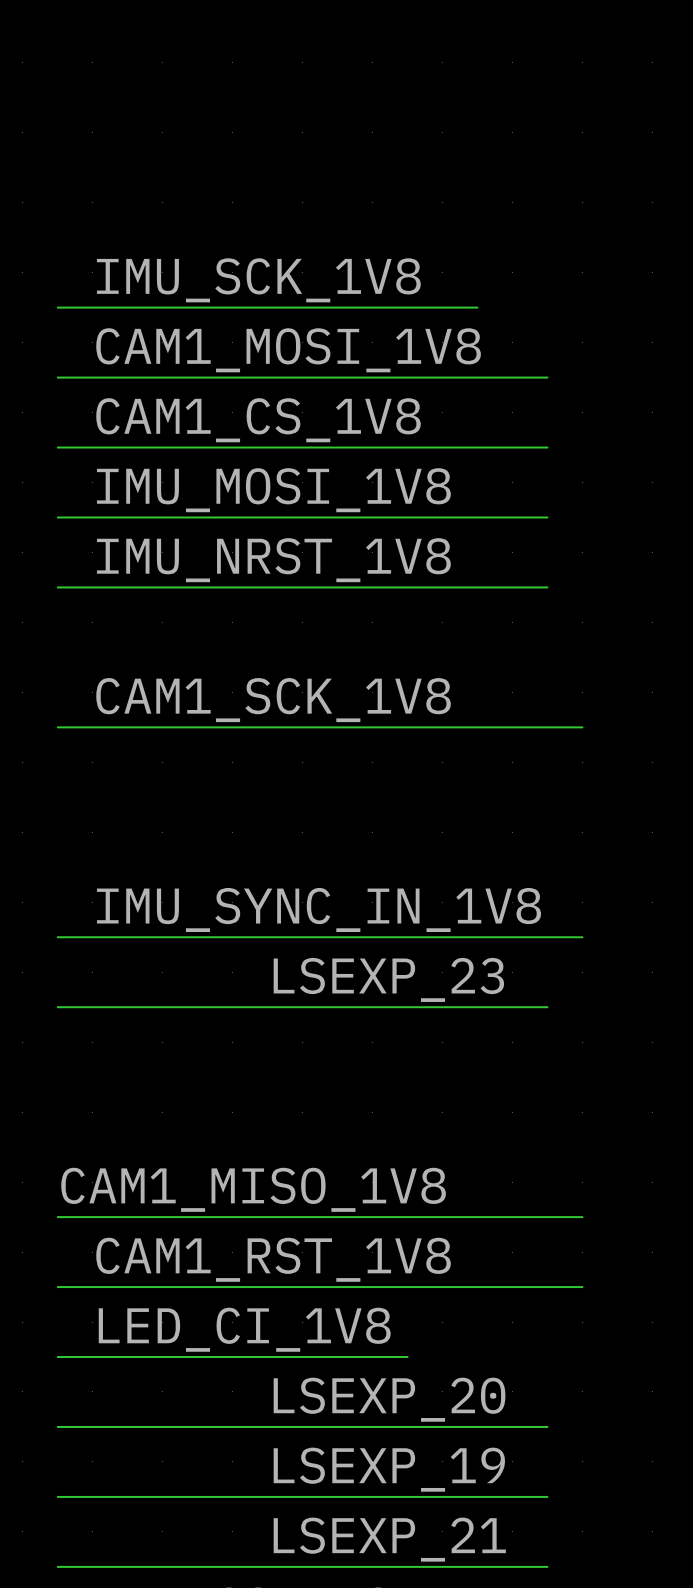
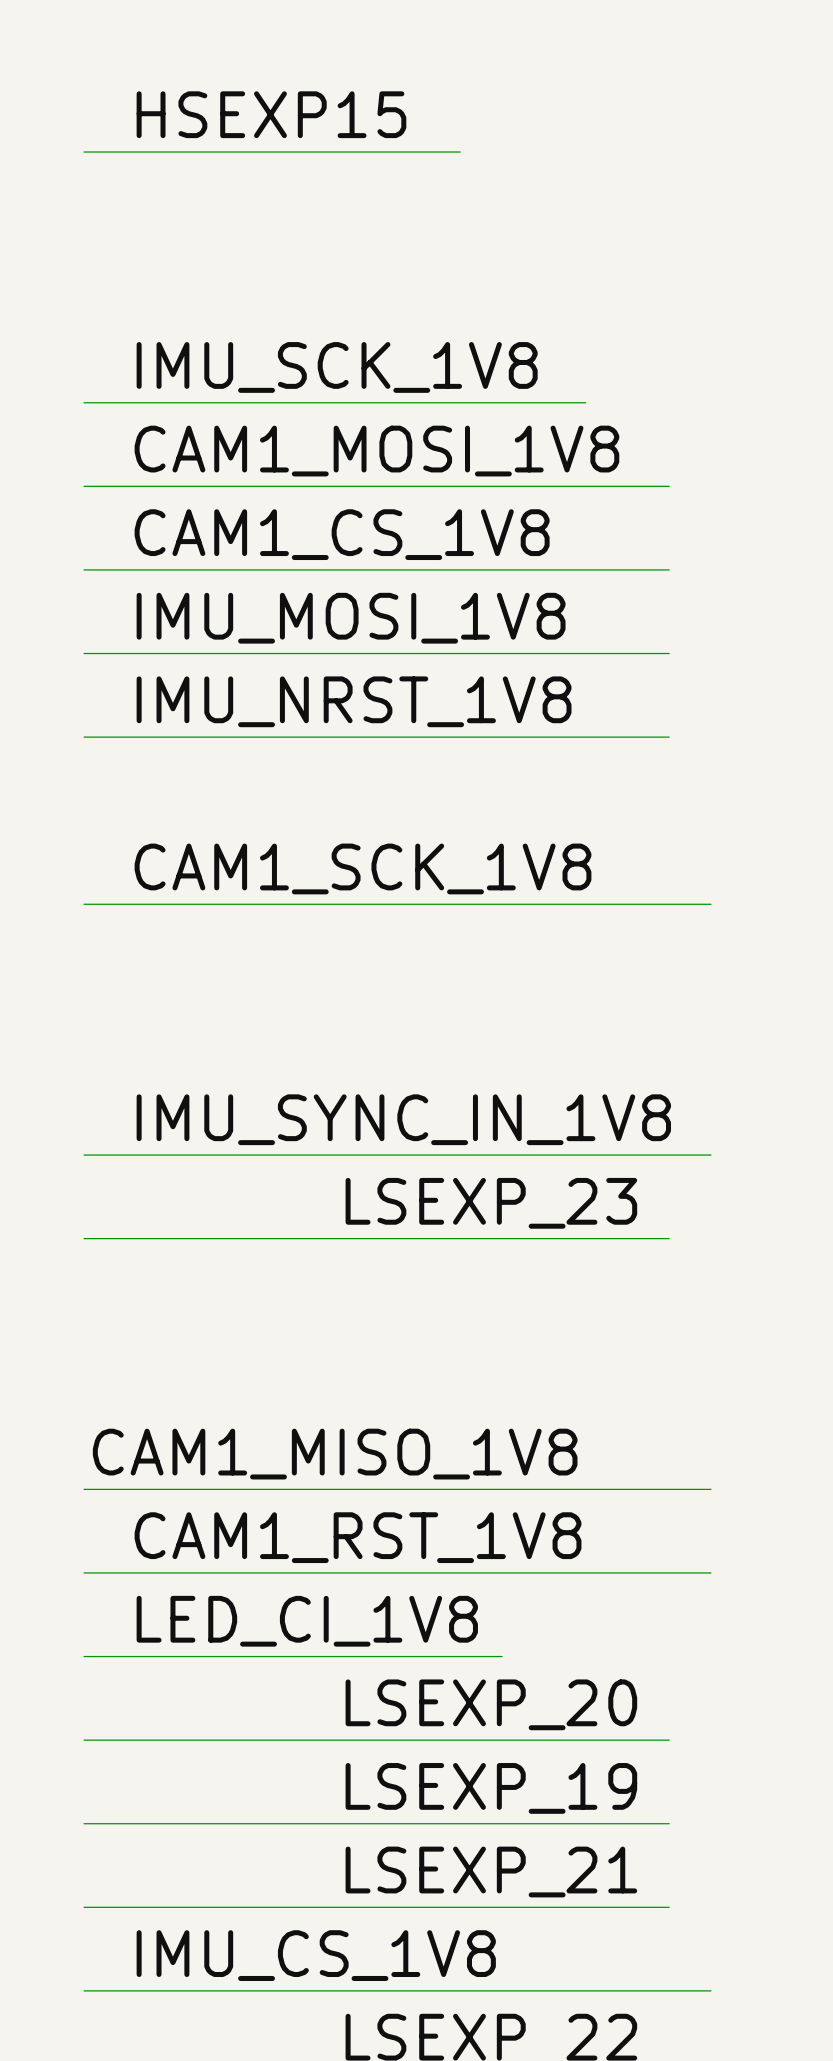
label: none -> HSEXP15 (271, 114)
wire: none -> (84, 152) (460, 152)

